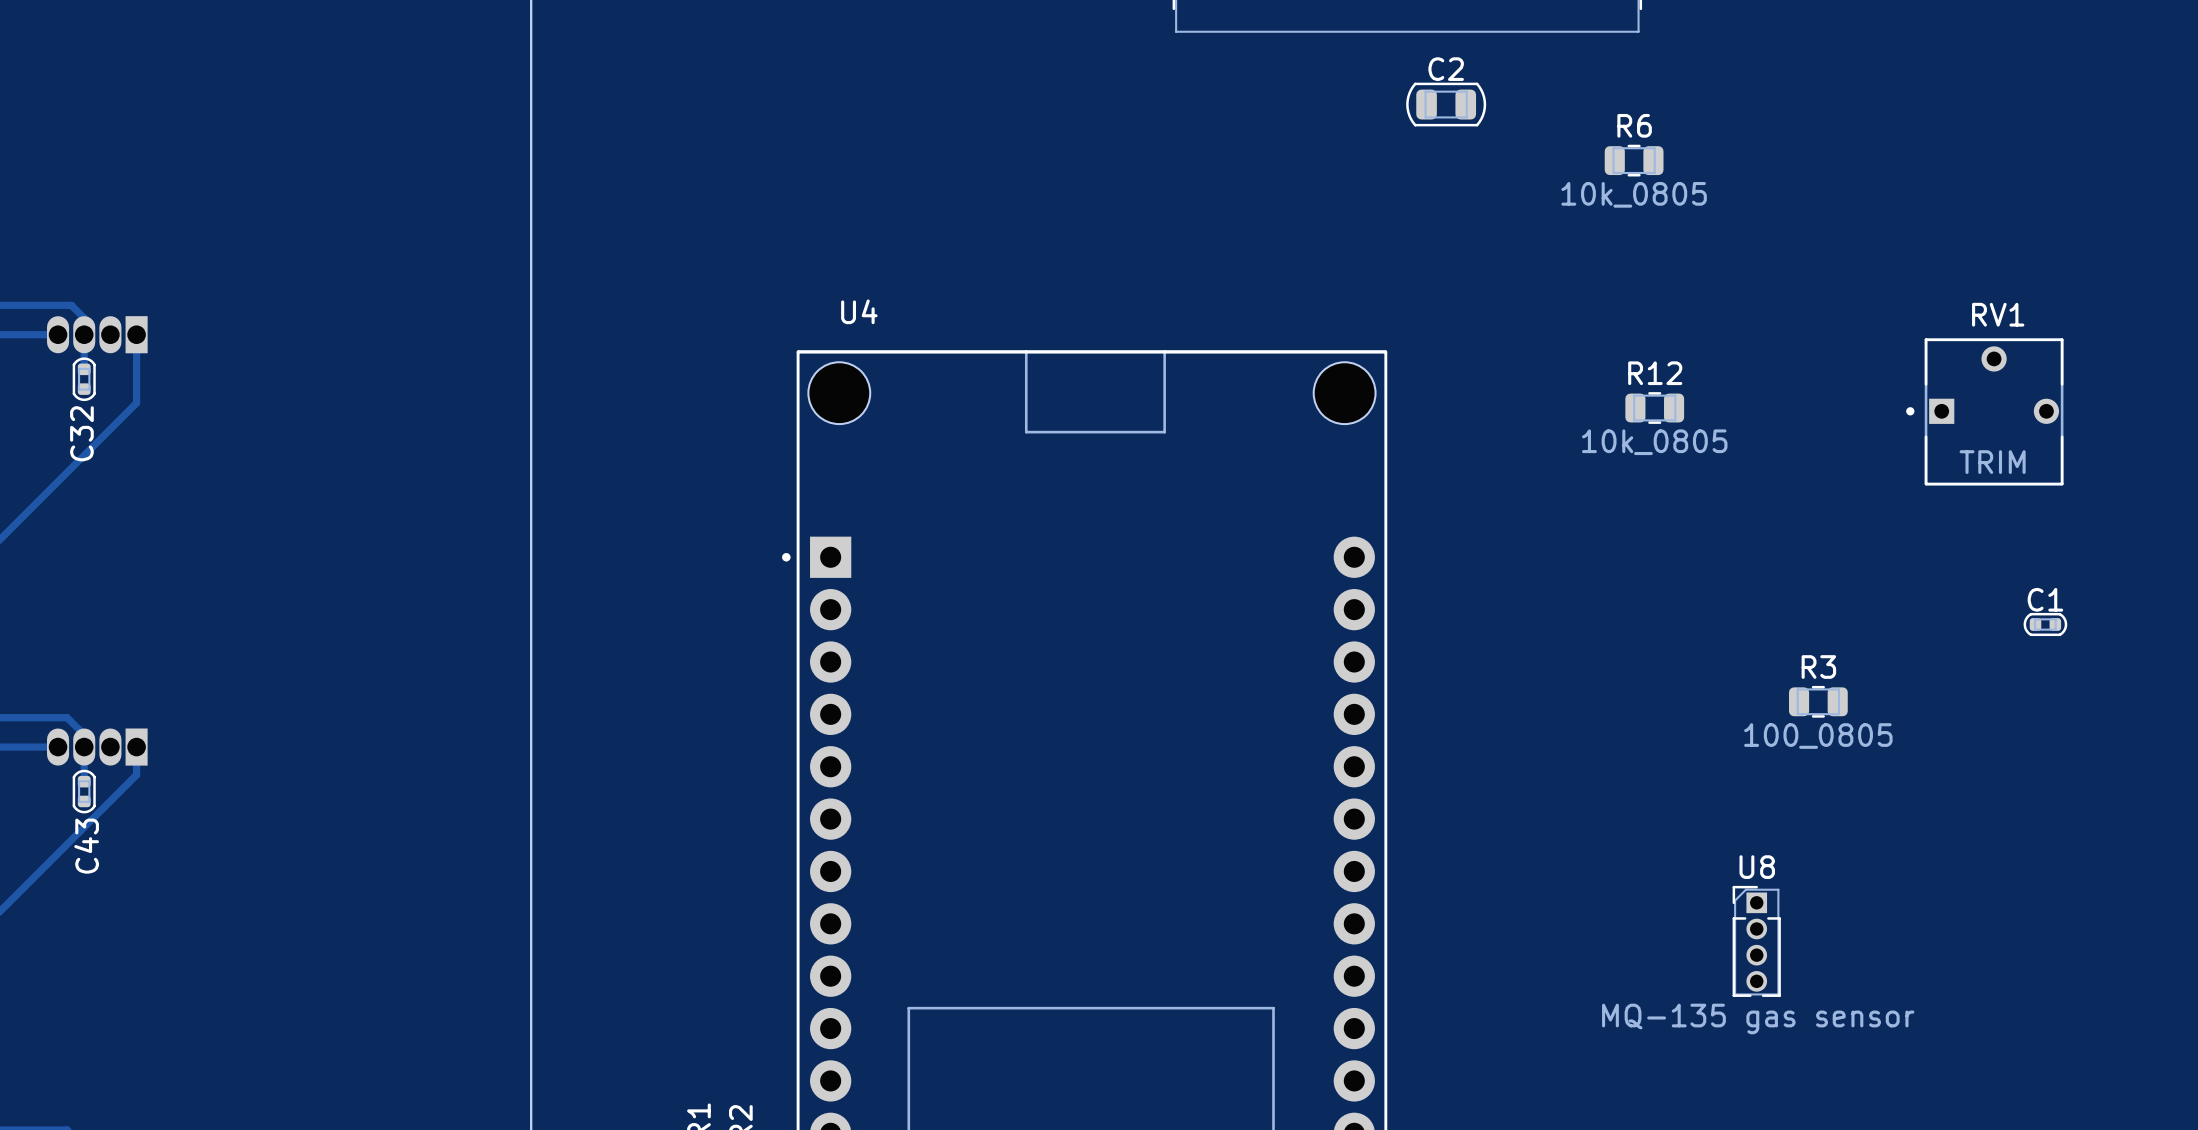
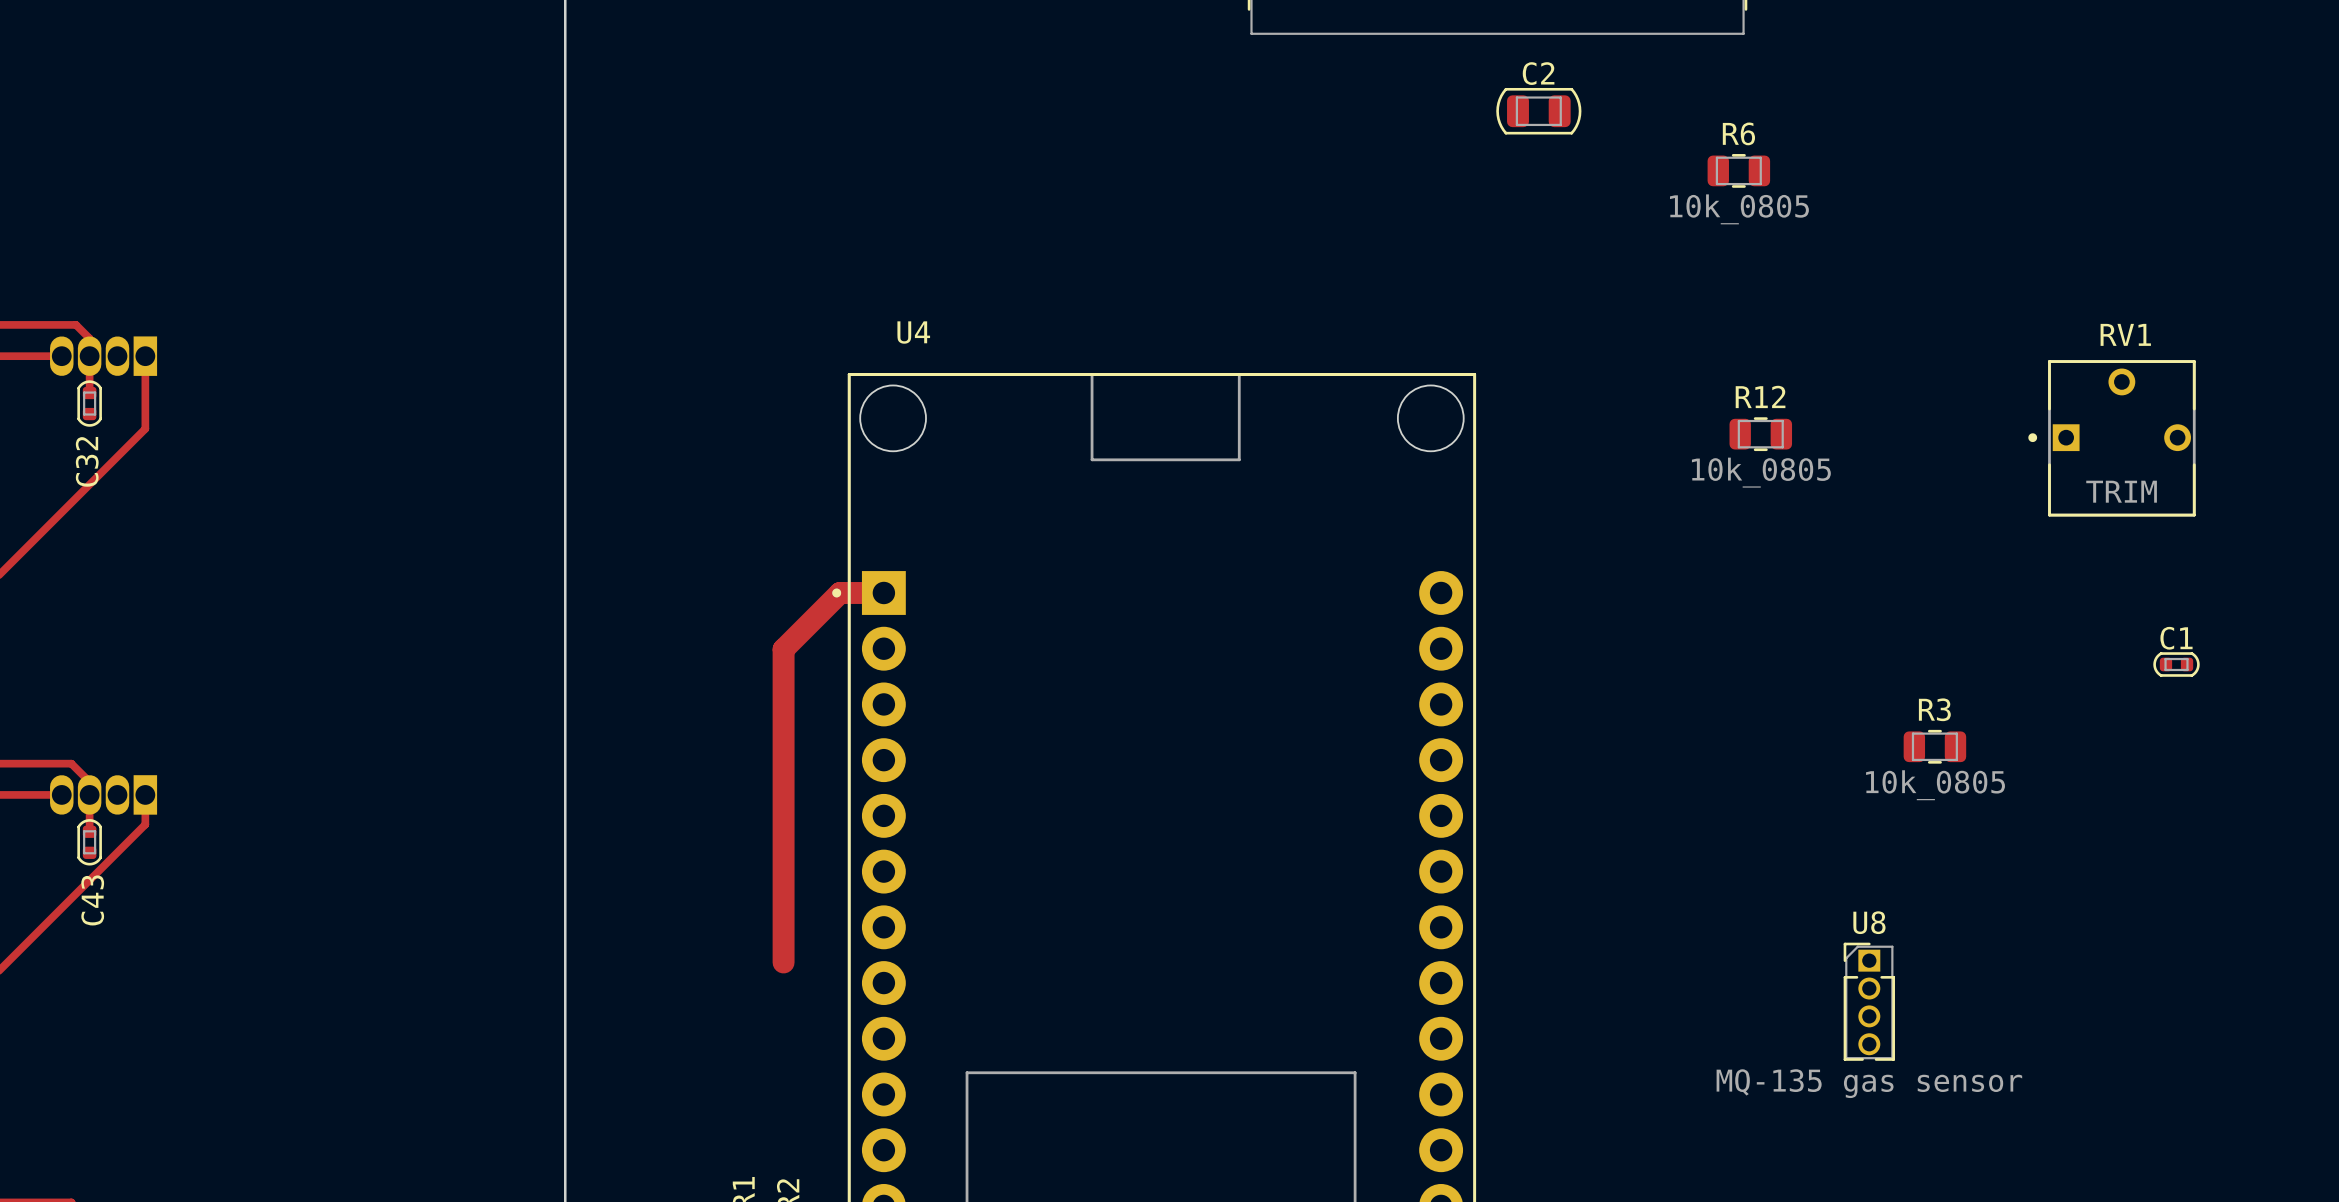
track: none -> (883, 592) (840, 592) (783, 649) (783, 962)
R3 value: 100_0805 (1818, 736) -> 10k_0805 (1935, 785)

